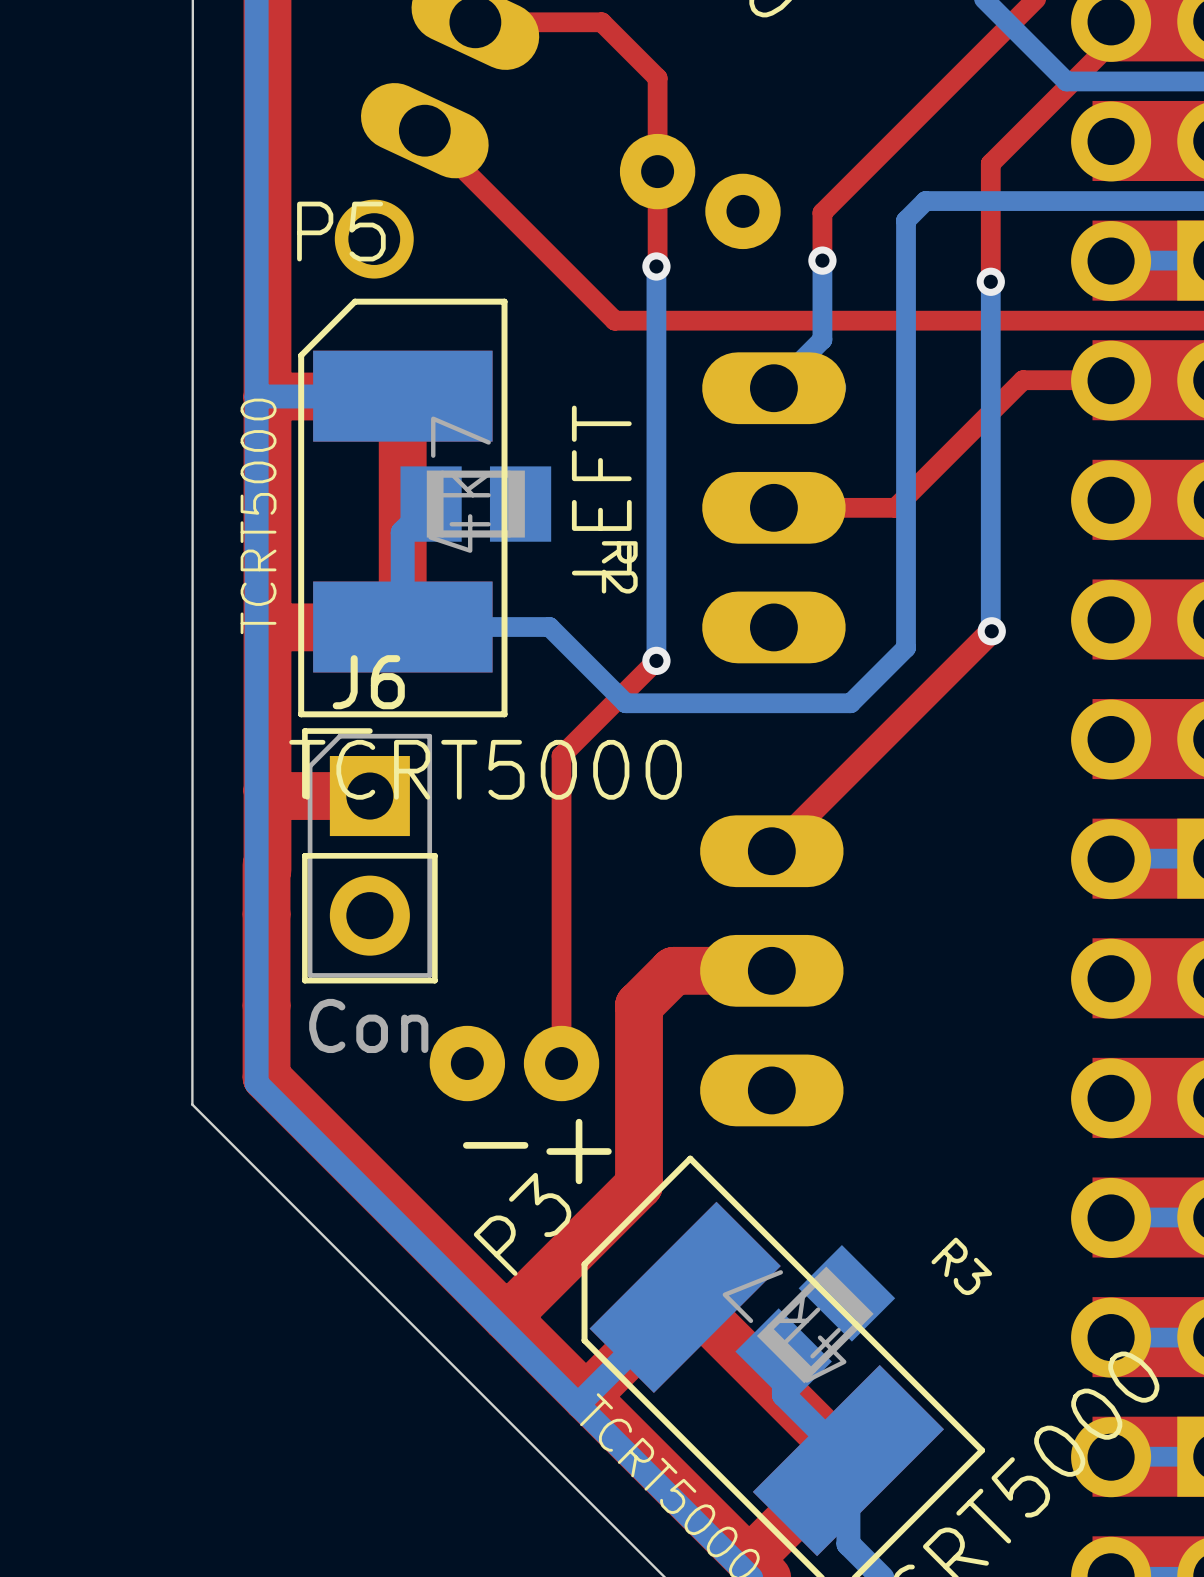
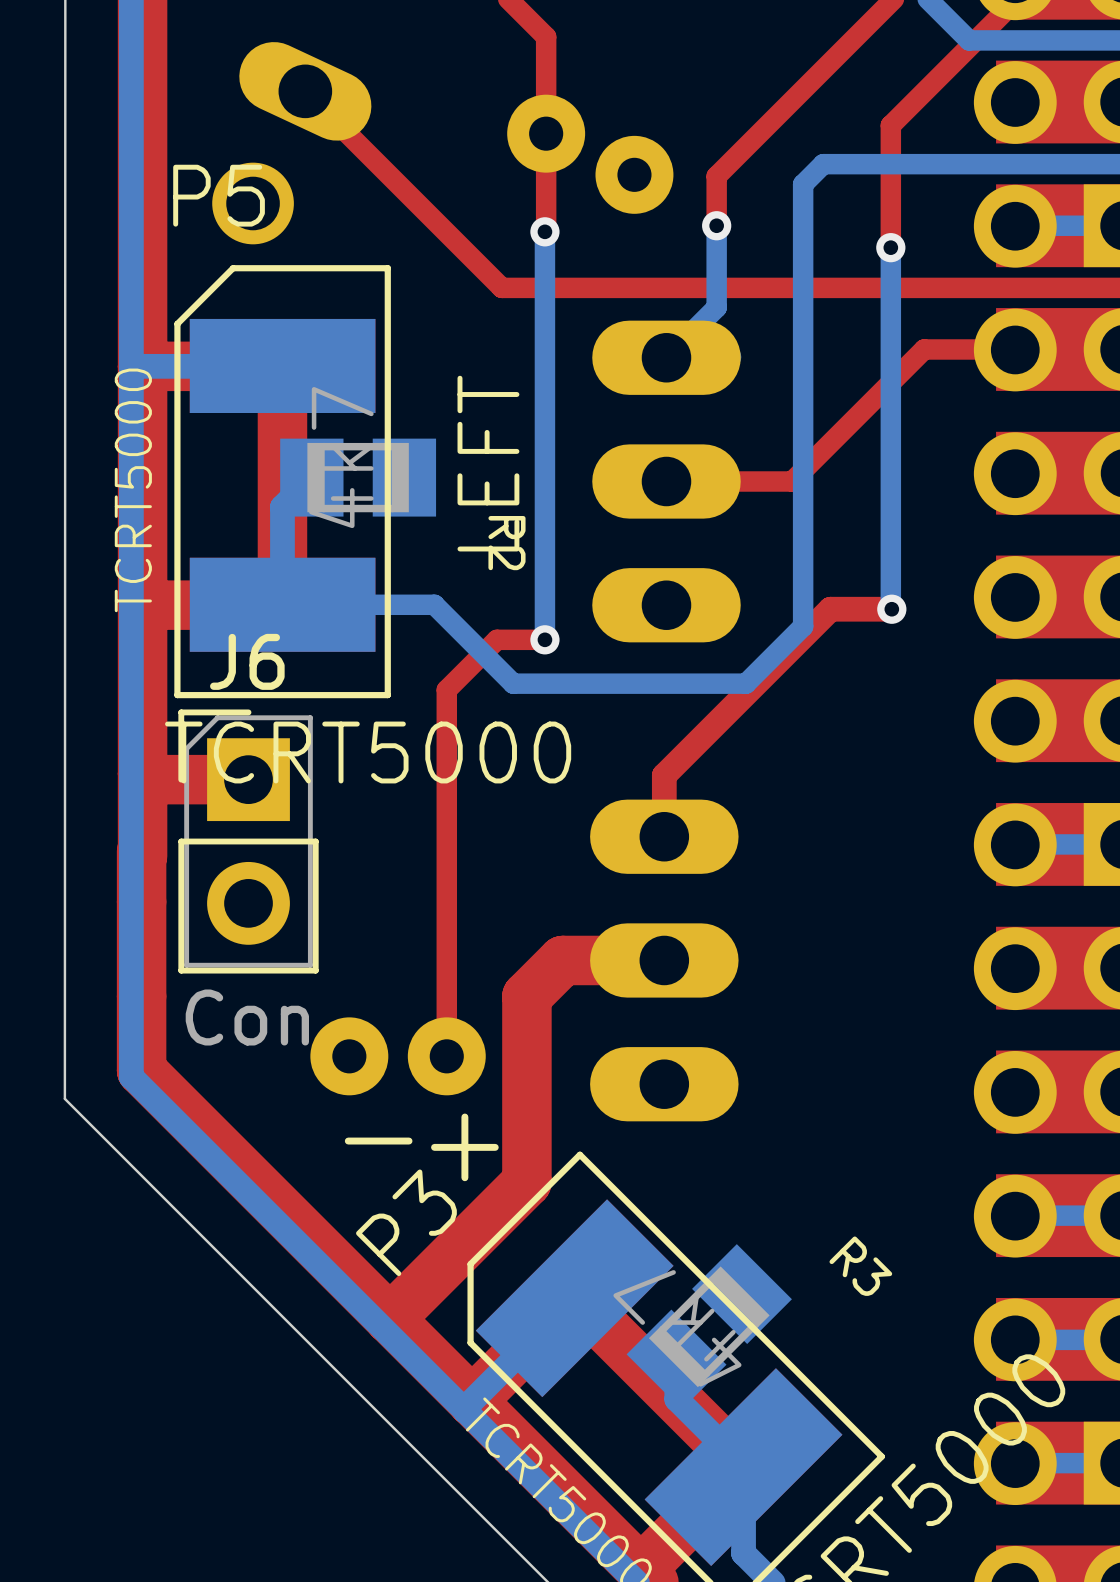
top track: (991, 631) (771, 851) -> (891, 609) (830, 609) (664, 775) (664, 836)
top track: (656, 660) (561, 755) -> (544, 639) (496, 639) (446, 690) (446, 737)

